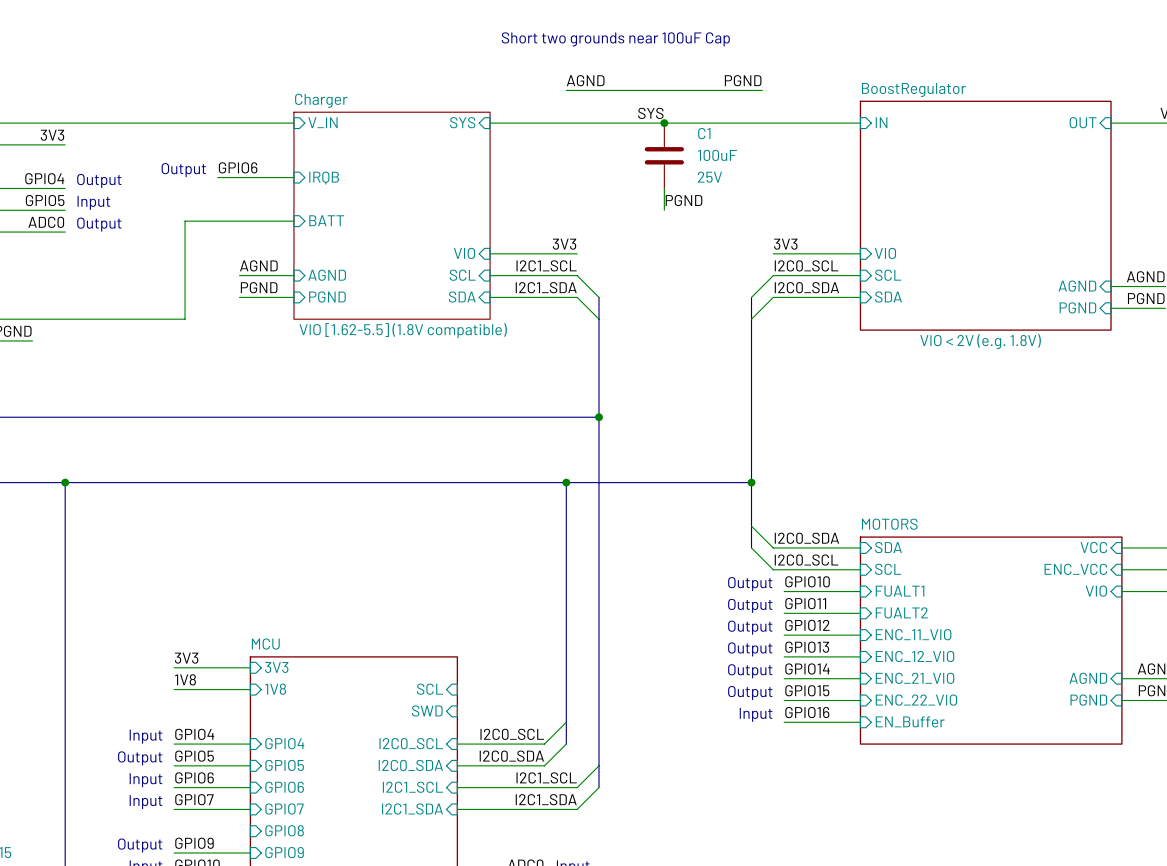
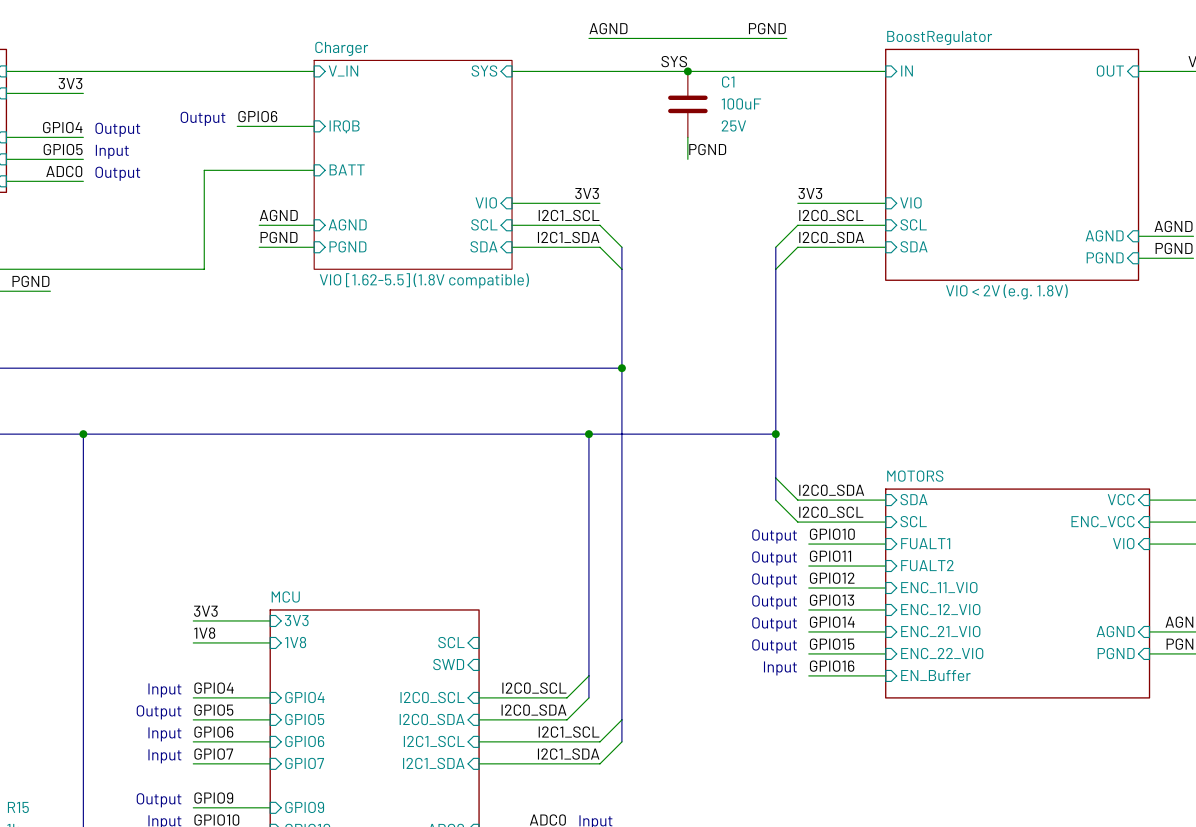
sheet pin: GPIO8 (284, 830) -> none

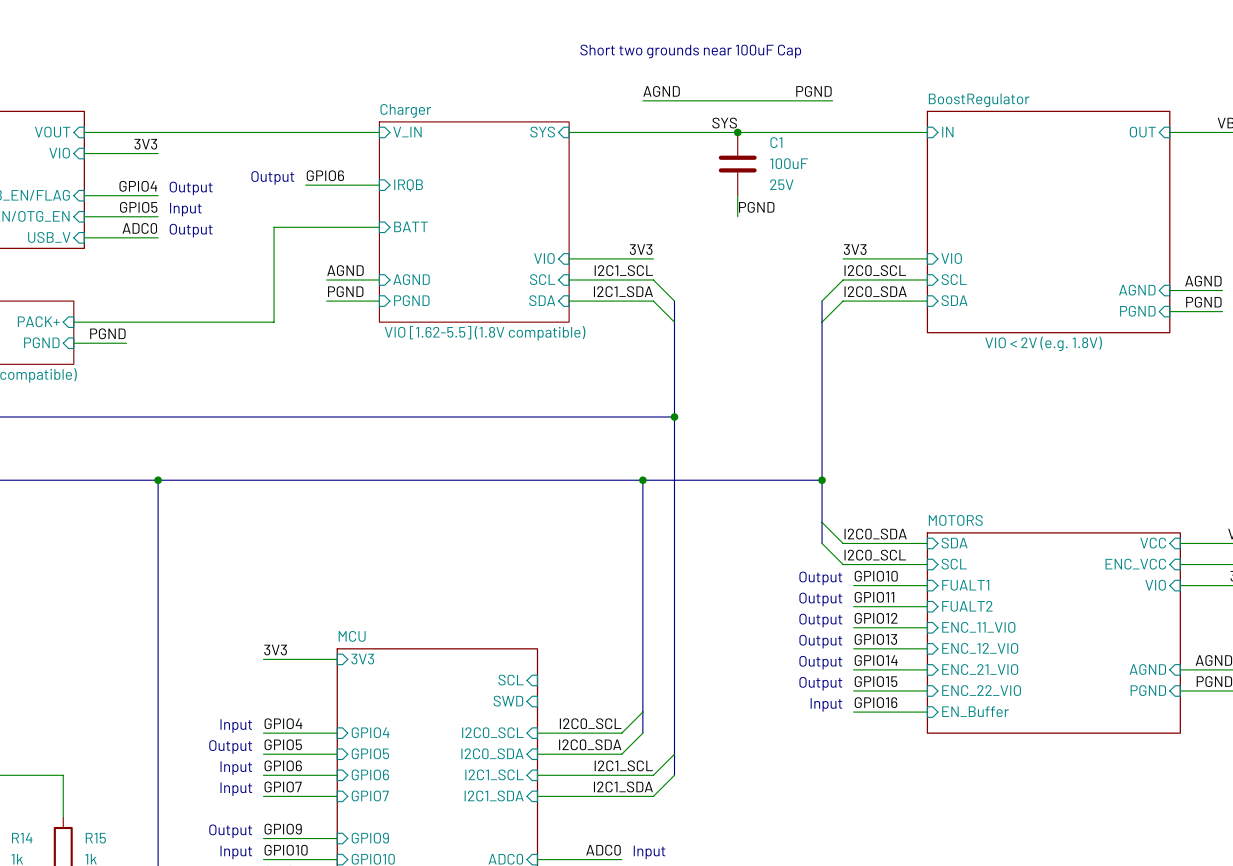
label: 1V8 (204, 633) -> none
wire: (193, 642) (270, 642) -> none
sheet pin: 1V8 (295, 642) -> none

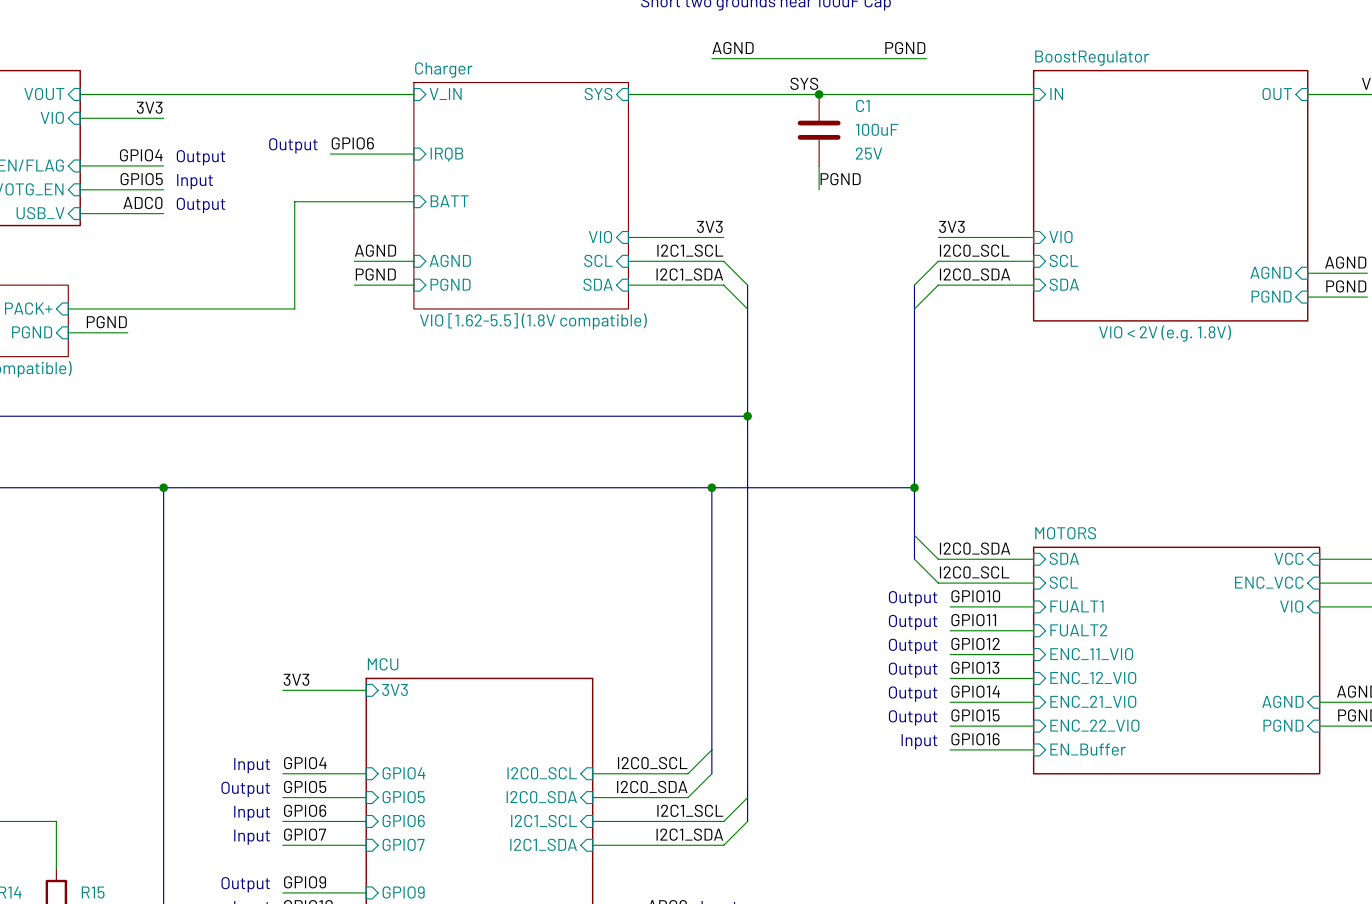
sheet pin: SCL (510, 680) -> none
sheet pin: SWD (508, 701) -> none

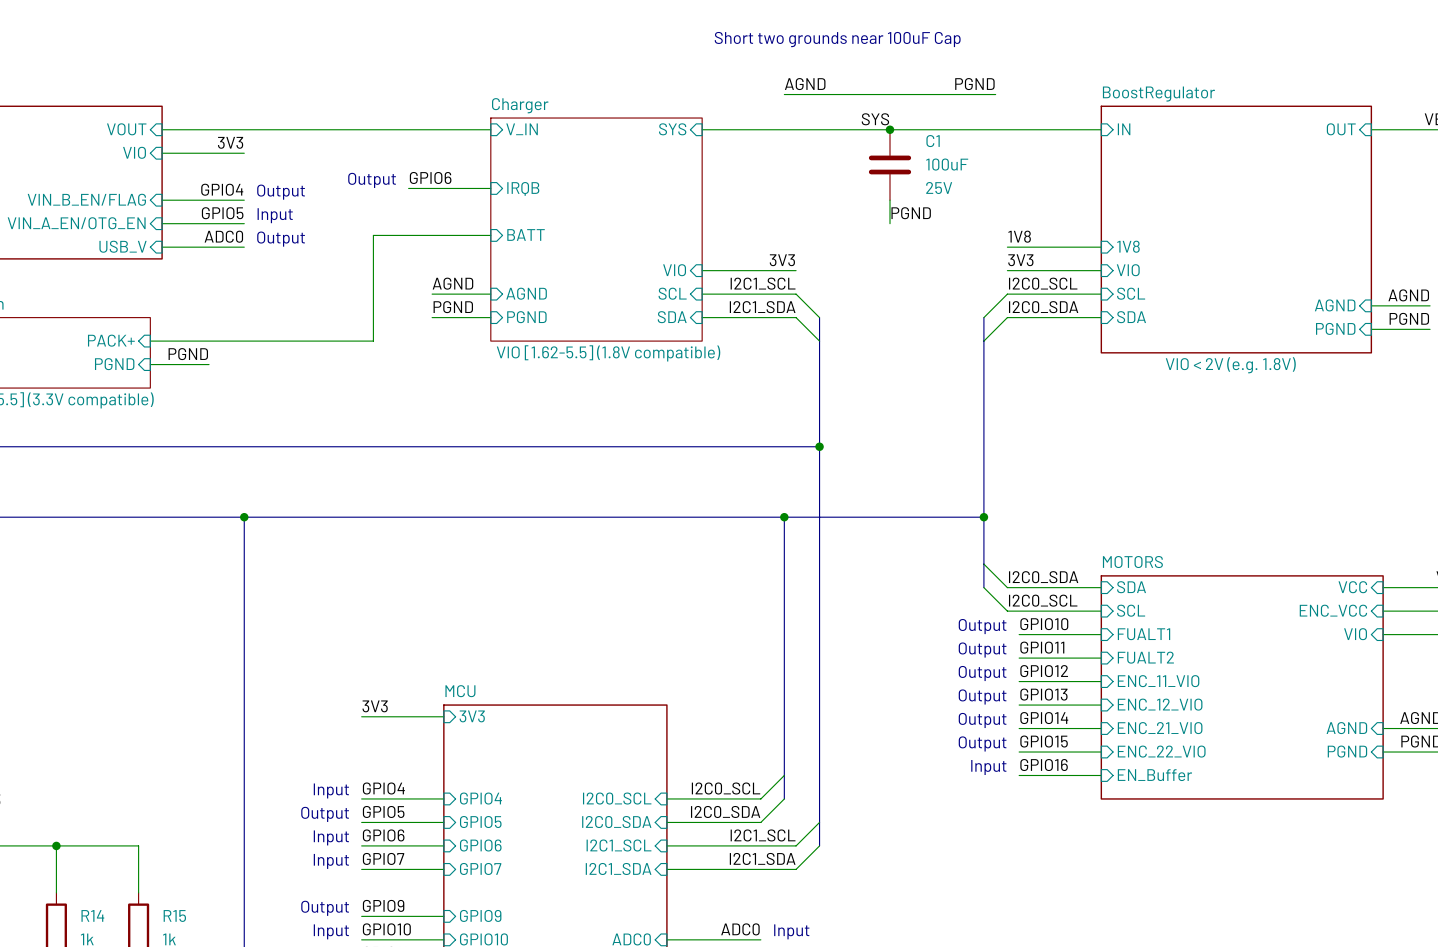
label: none -> 1V8 (1019, 236)
wire: none -> (1007, 247) (1101, 247)
sheet pin: none -> 1V8 (1128, 246)

